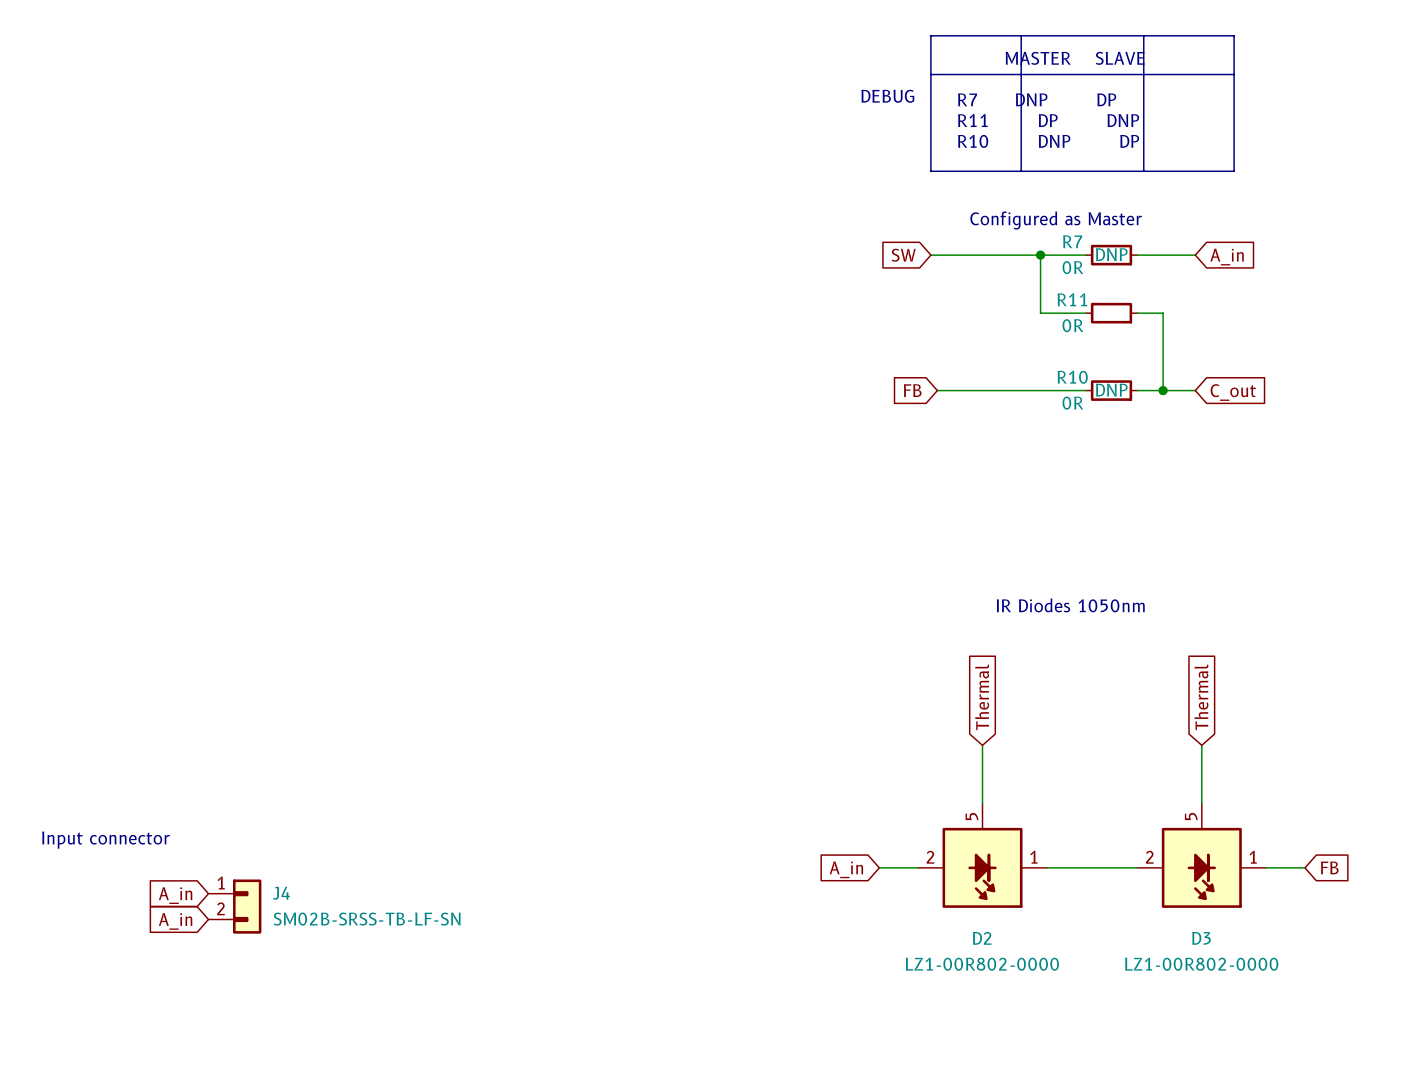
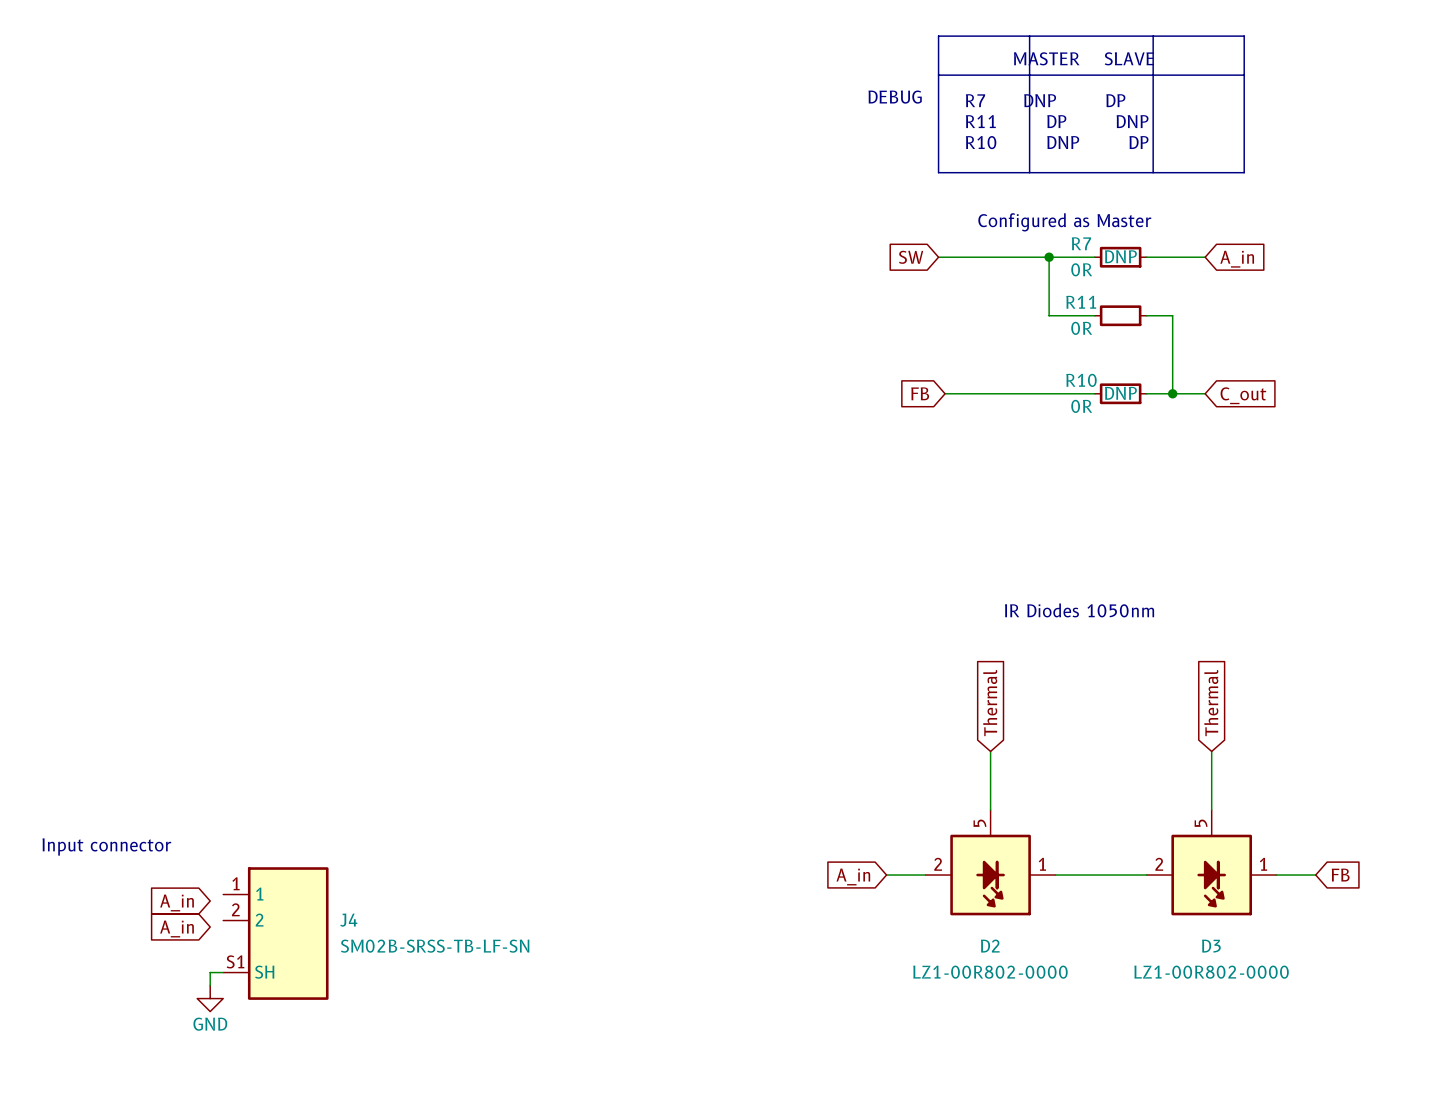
J4 symbol: [208, 879, 262, 934] -> [223, 867, 329, 1000]
J4 name position: J4 (281, 893) -> J4 (348, 920)
J4 value position: SM02B-SRSS-TB-LF-SN (367, 919) -> SM02B-SRSS-TB-LF-SN (435, 946)
wire: none -> (223, 972) (210, 972) (210, 985)
power symbol: none -> GND (210, 998)

